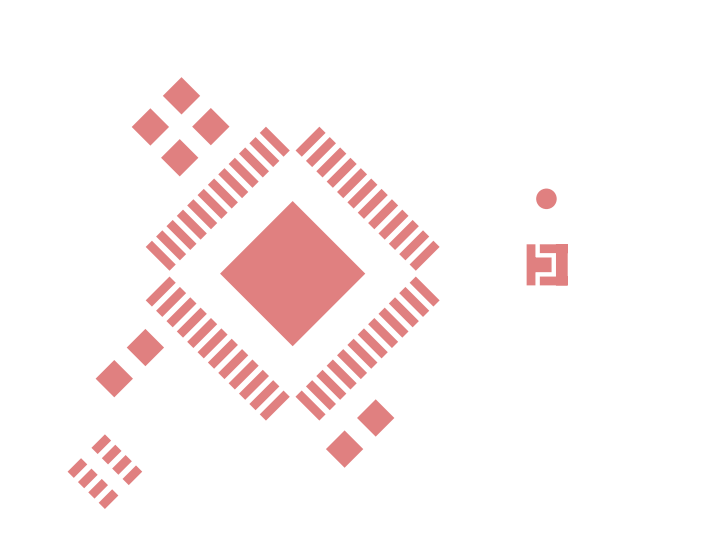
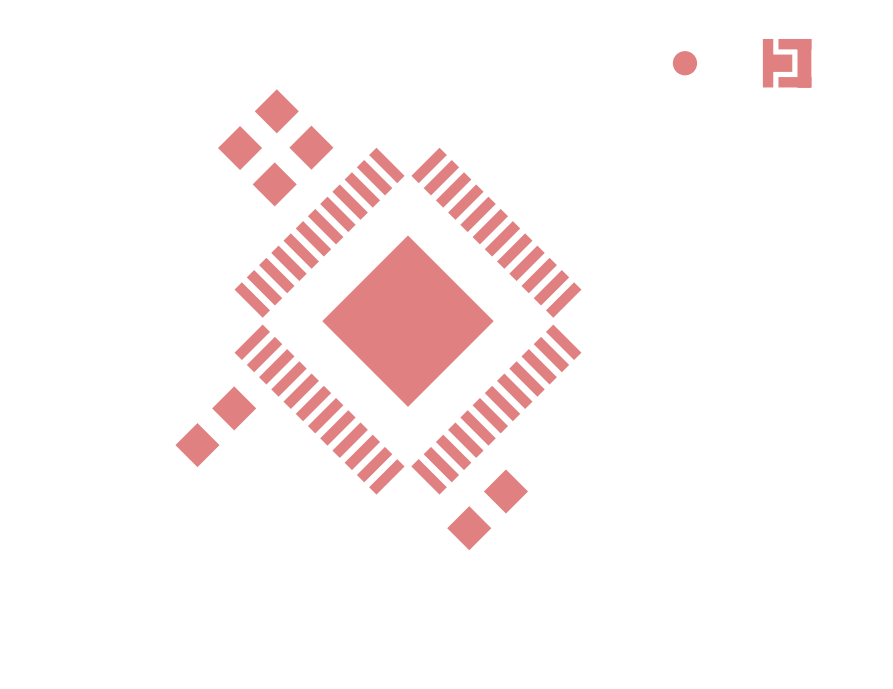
part position: (546, 198) -> (684, 63)
part position: (547, 264) -> (787, 63)
part: (104, 471) -> none

